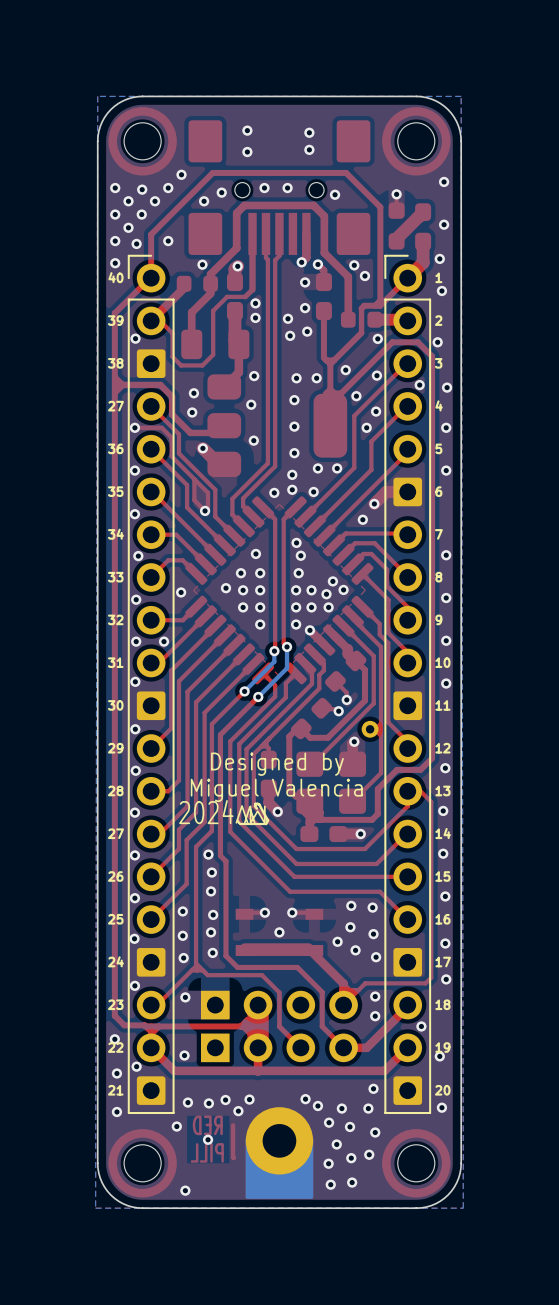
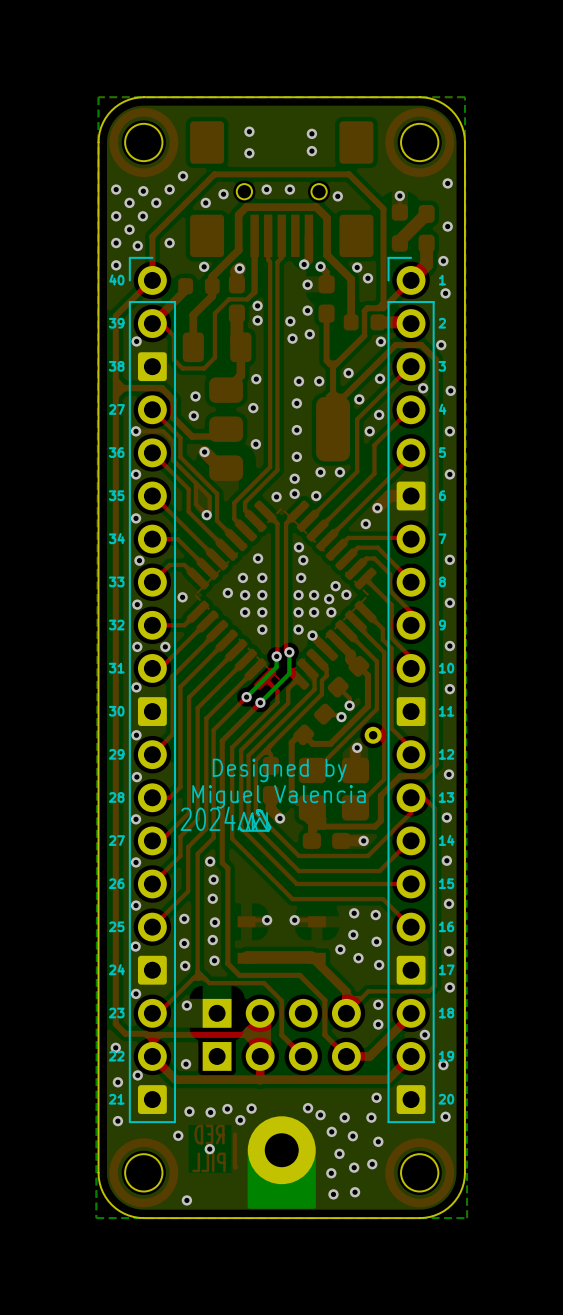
via: (279, 932) -> none

